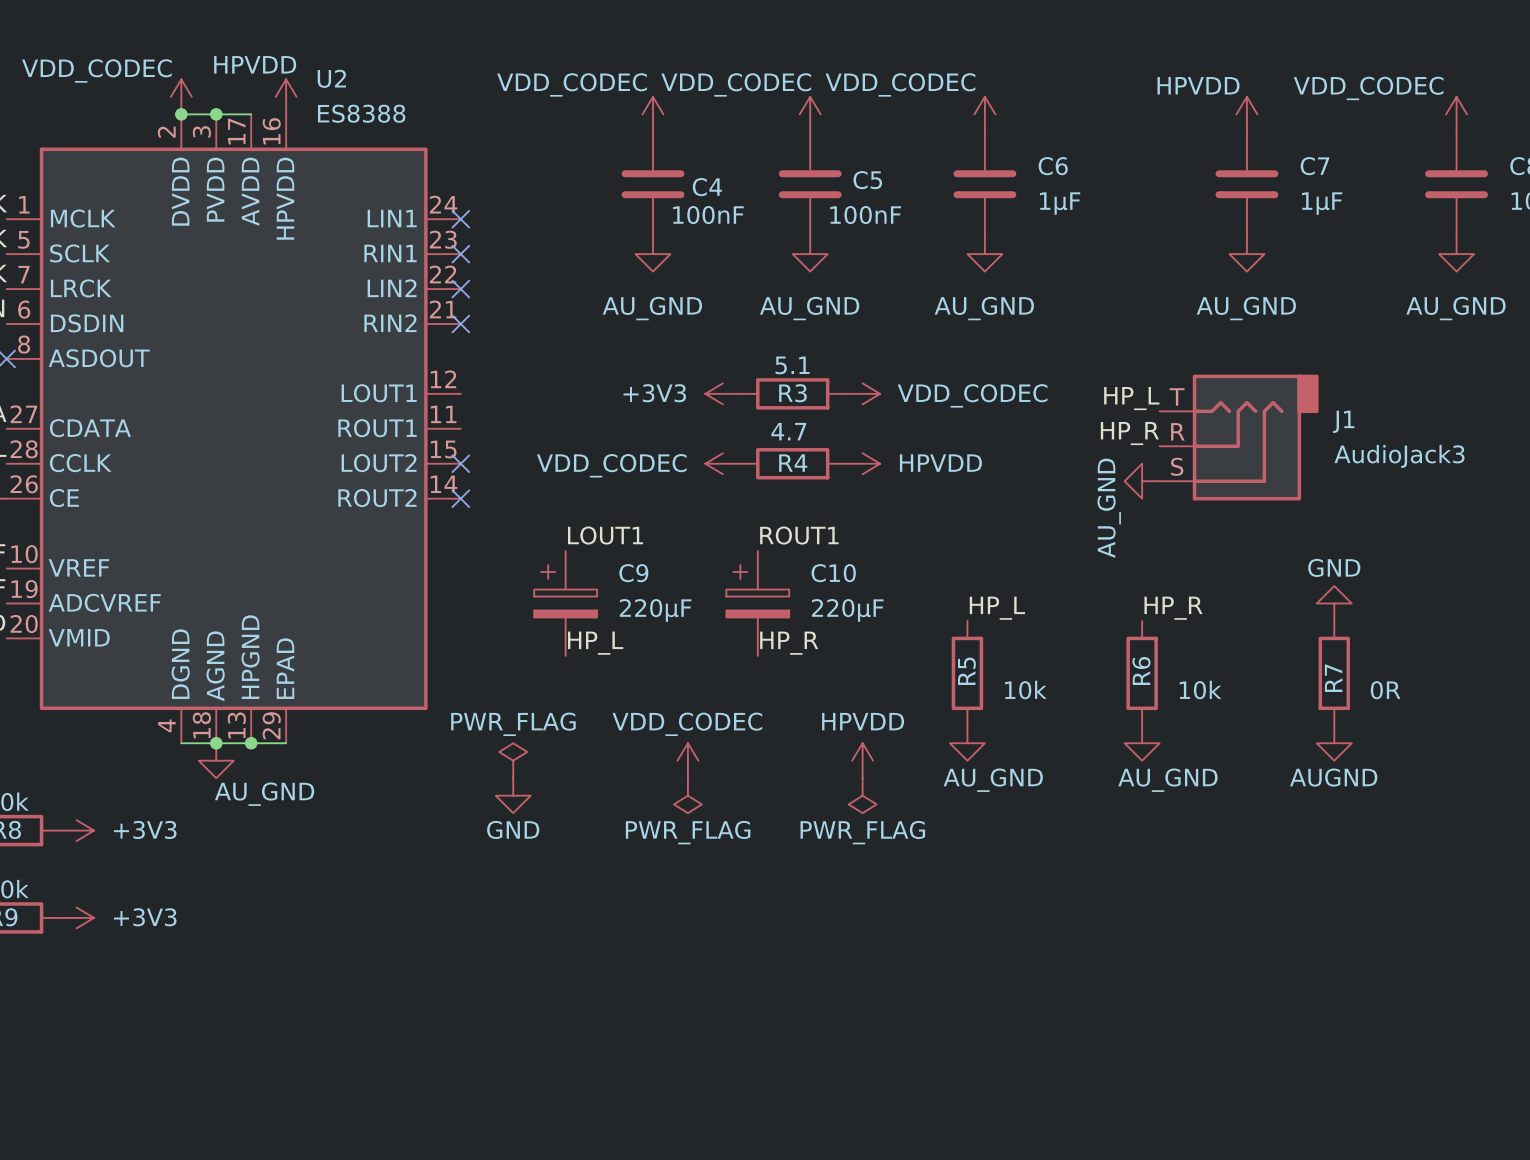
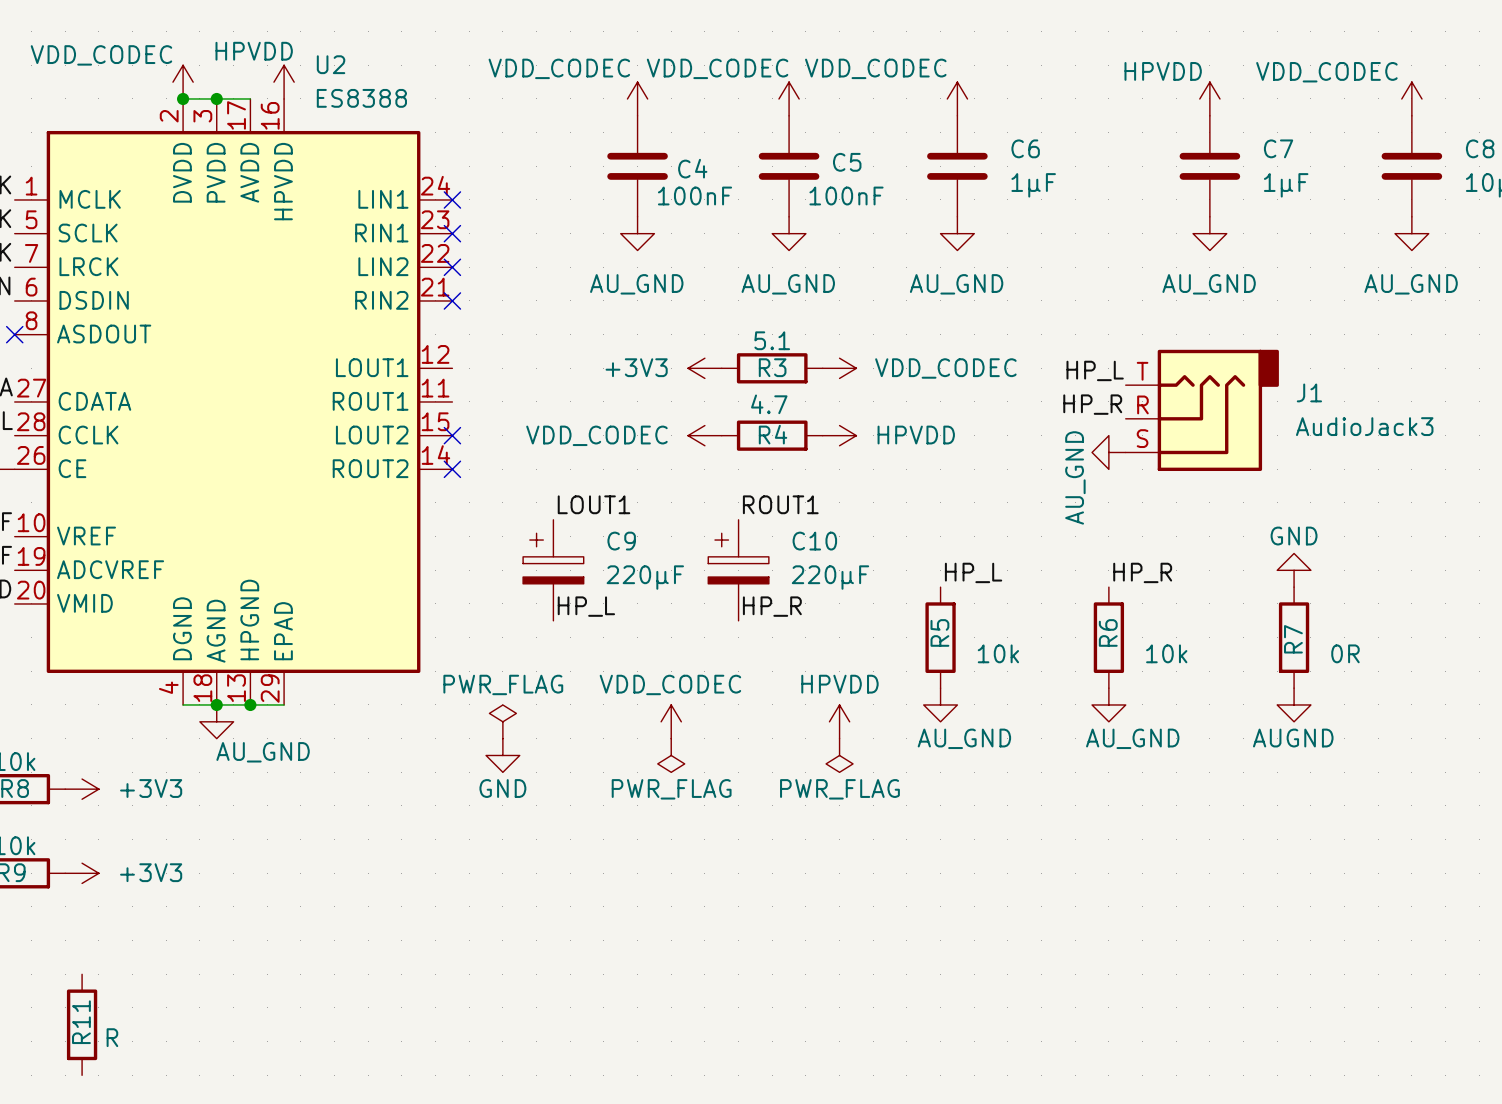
R11: none -> R (82, 1024)

